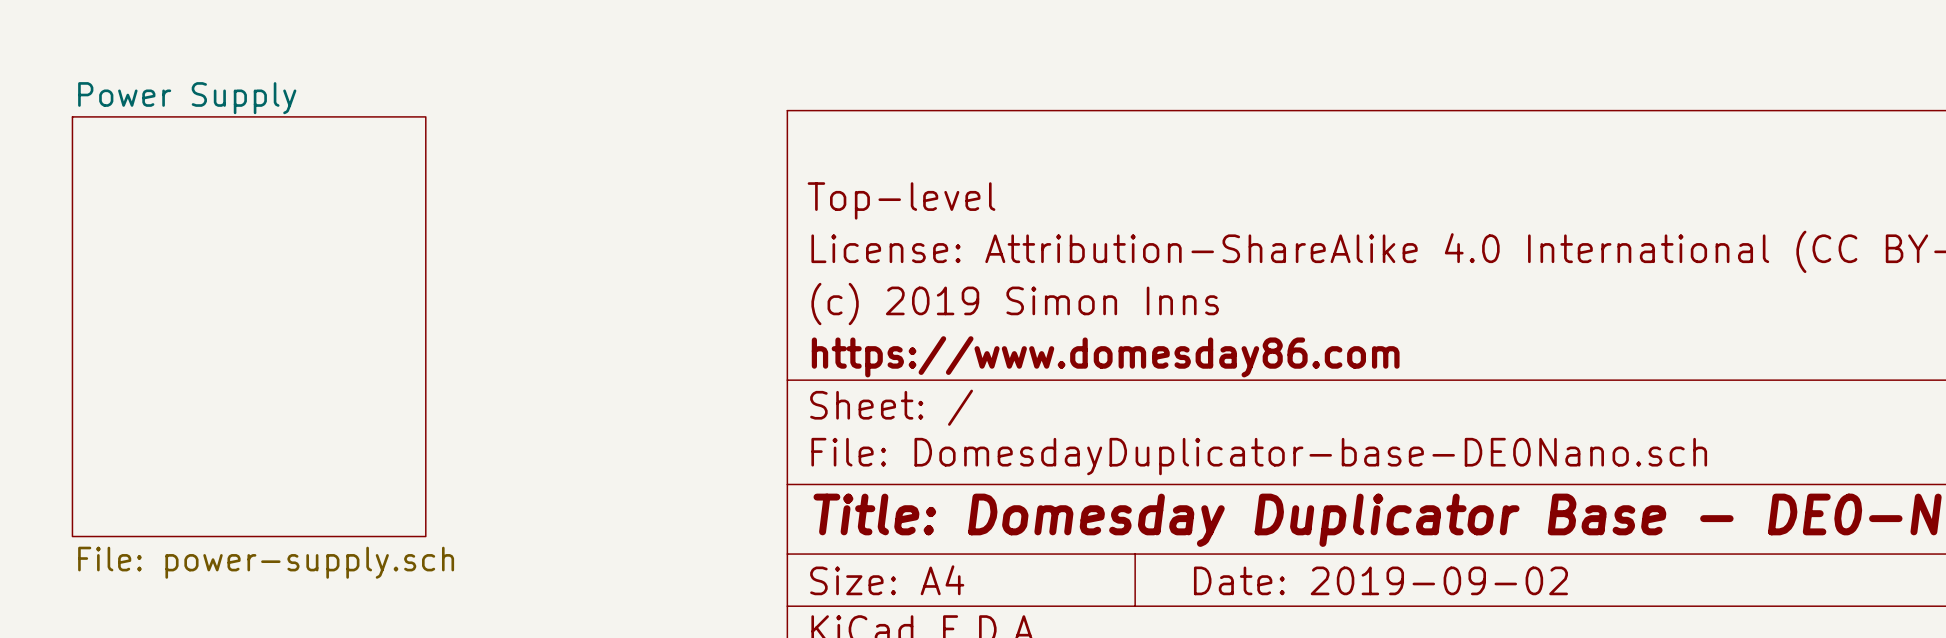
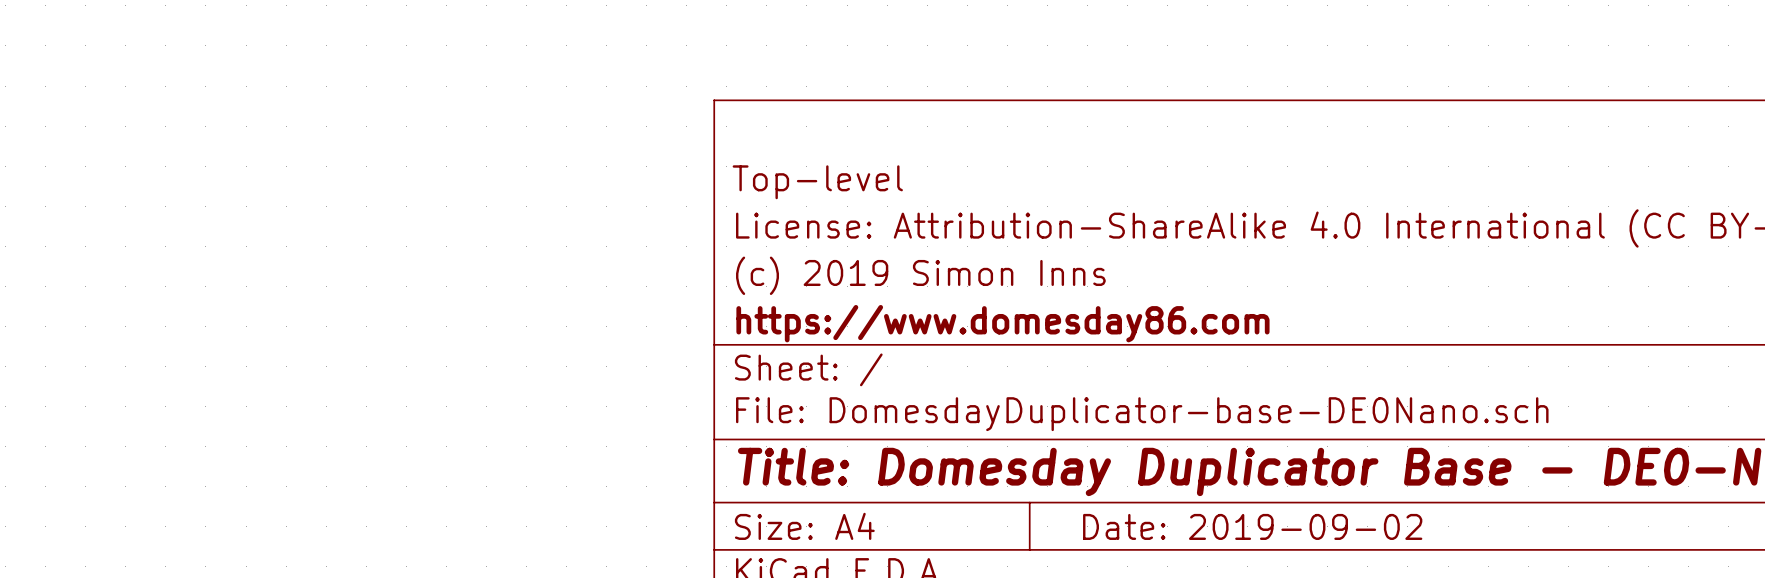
sheet Power Supply: File: power-supply.sch (249, 326) -> none

